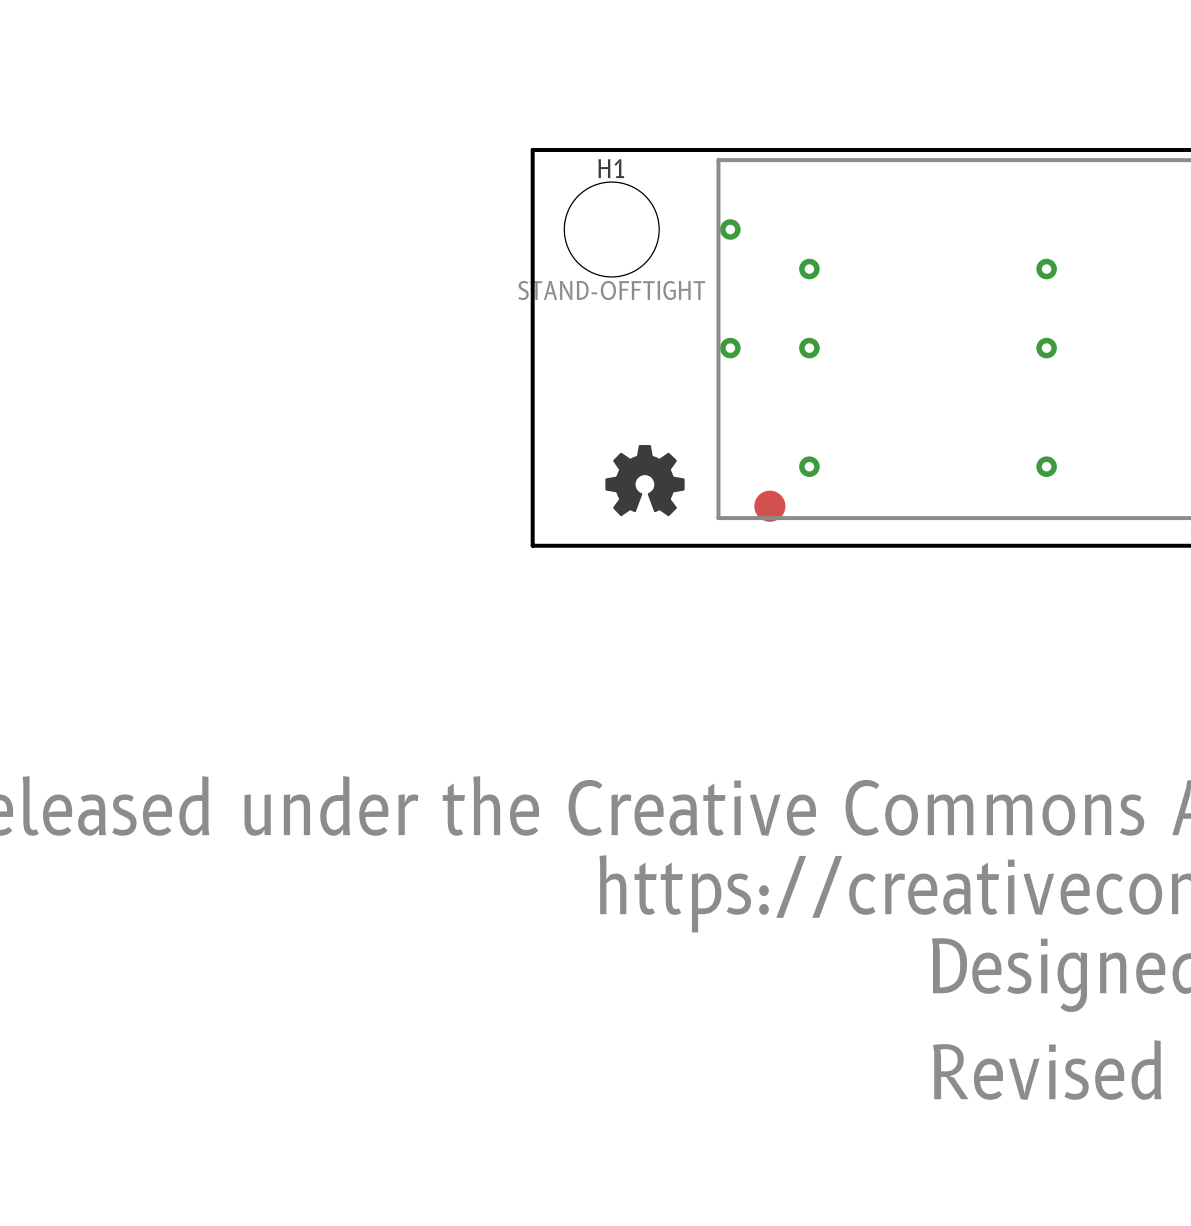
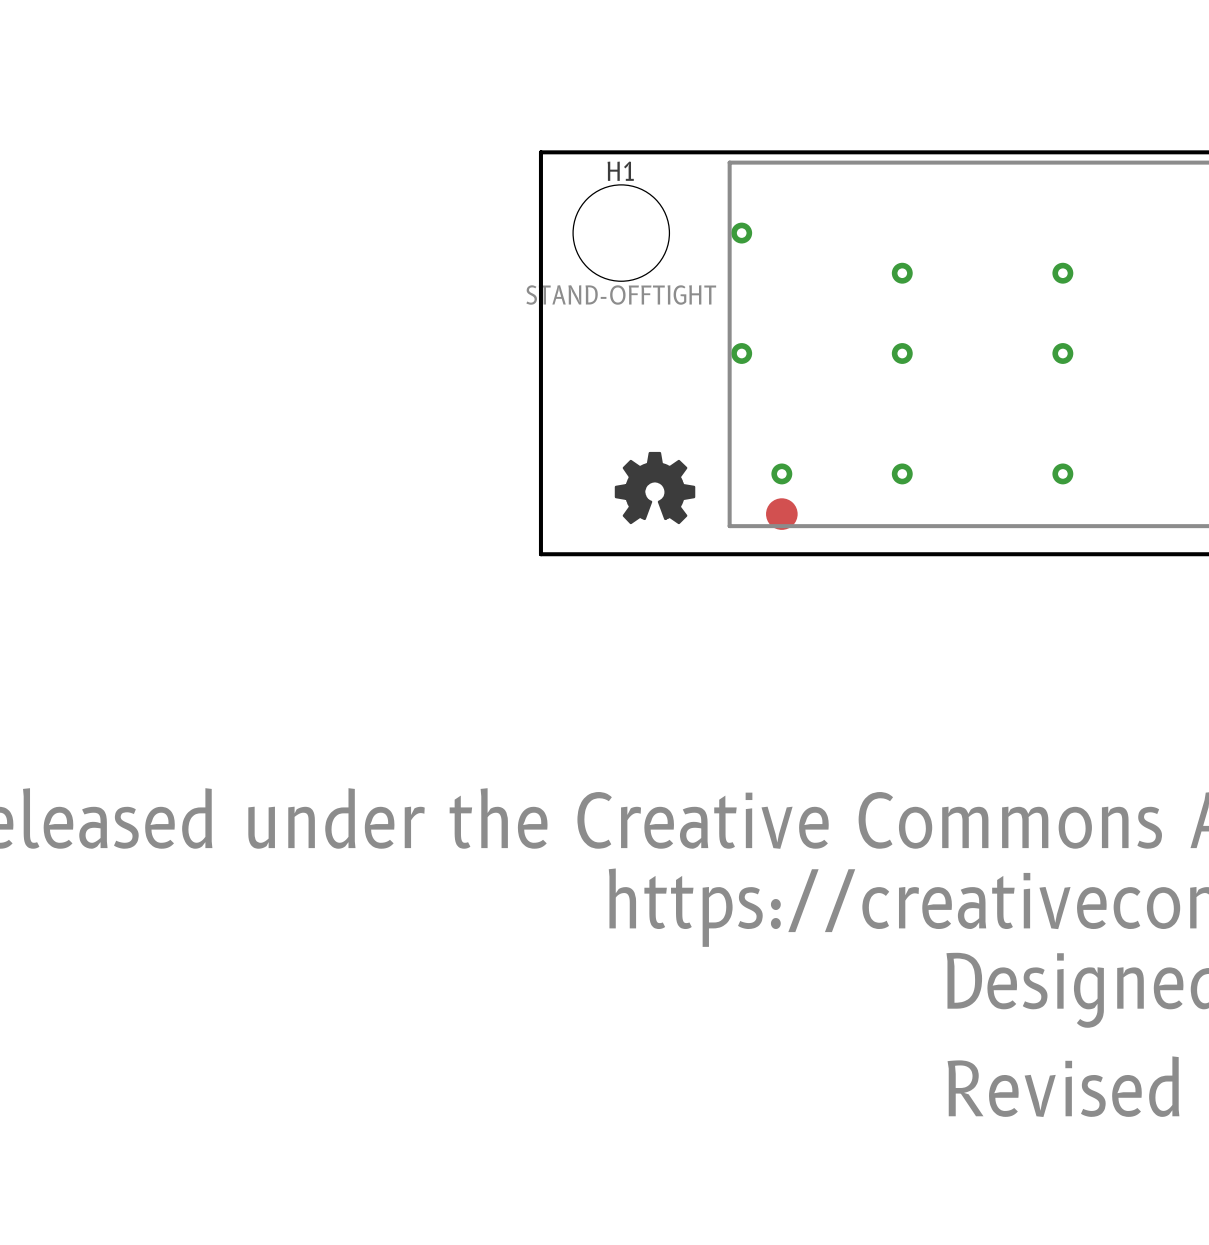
via: (809, 269) -> none
via: none -> (902, 273)
via: (809, 348) -> none
via: none -> (902, 353)
via: none -> (781, 473)
via: (809, 466) -> none
via: none -> (902, 473)

